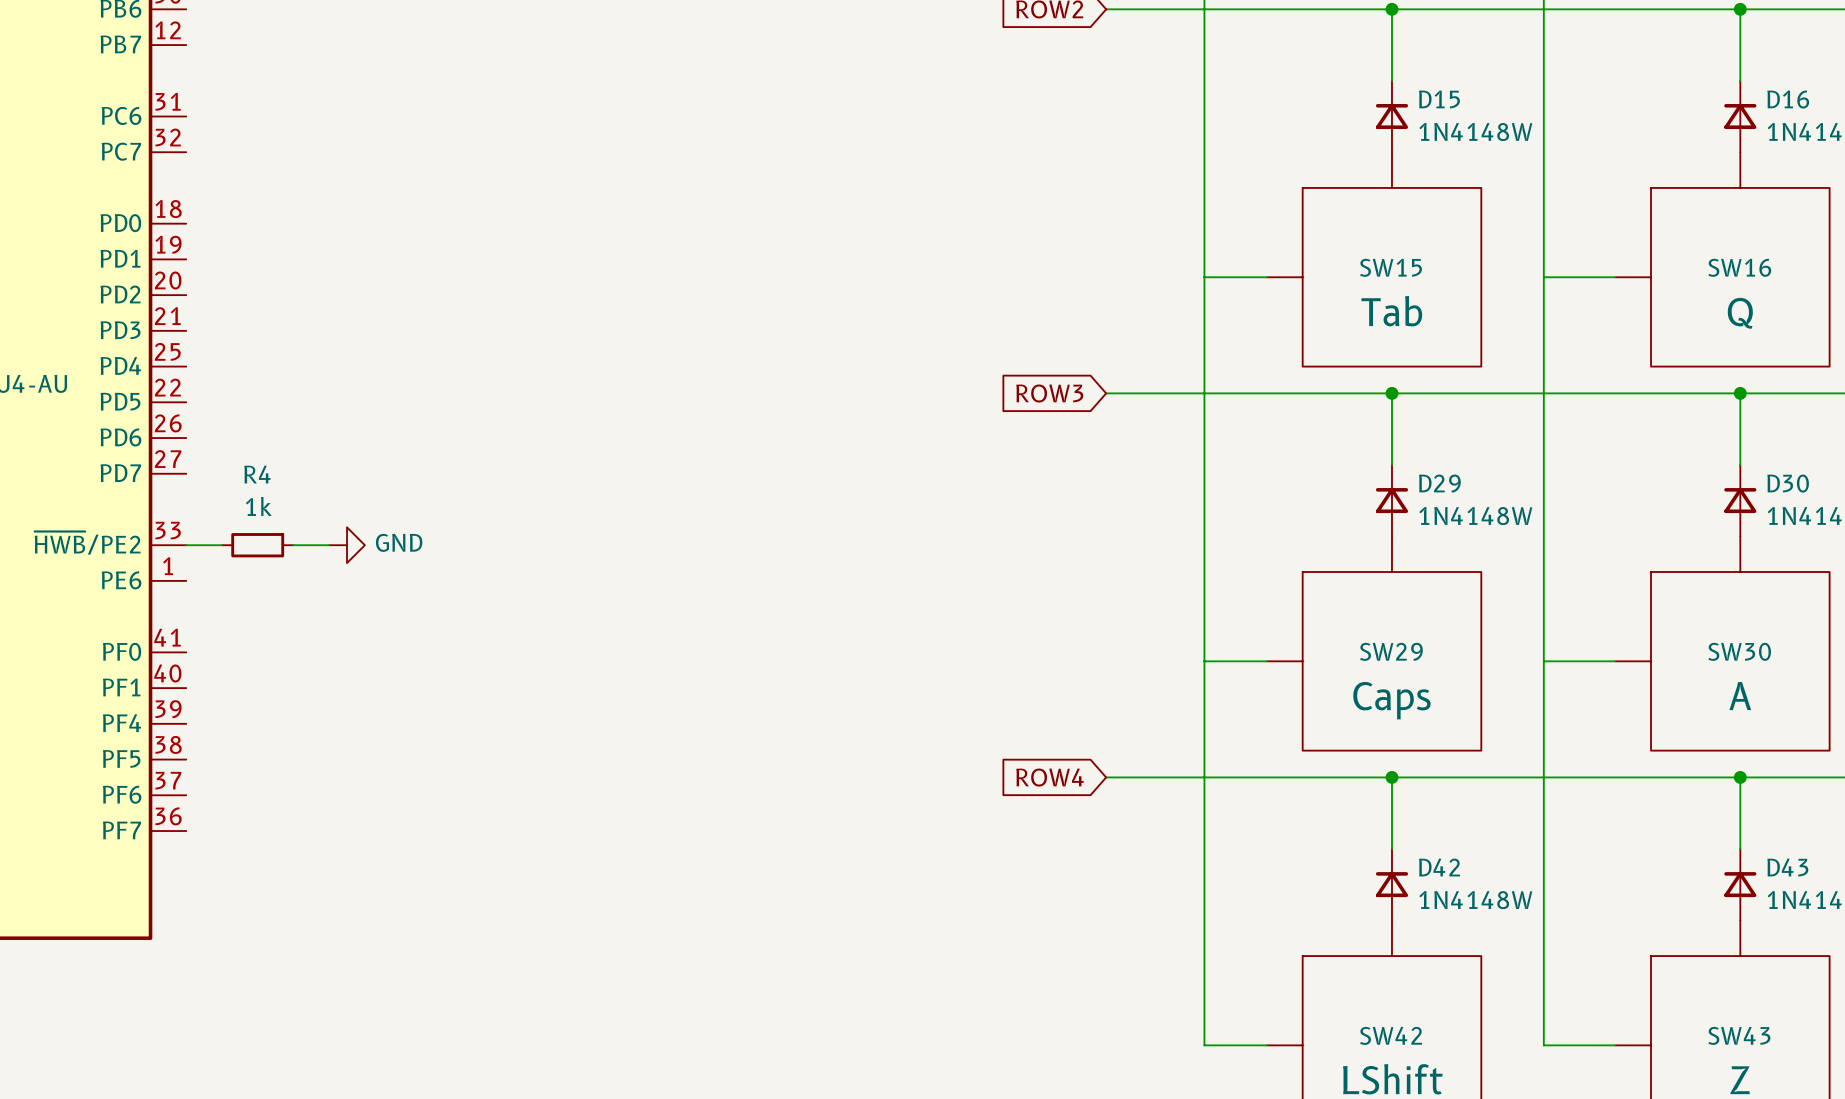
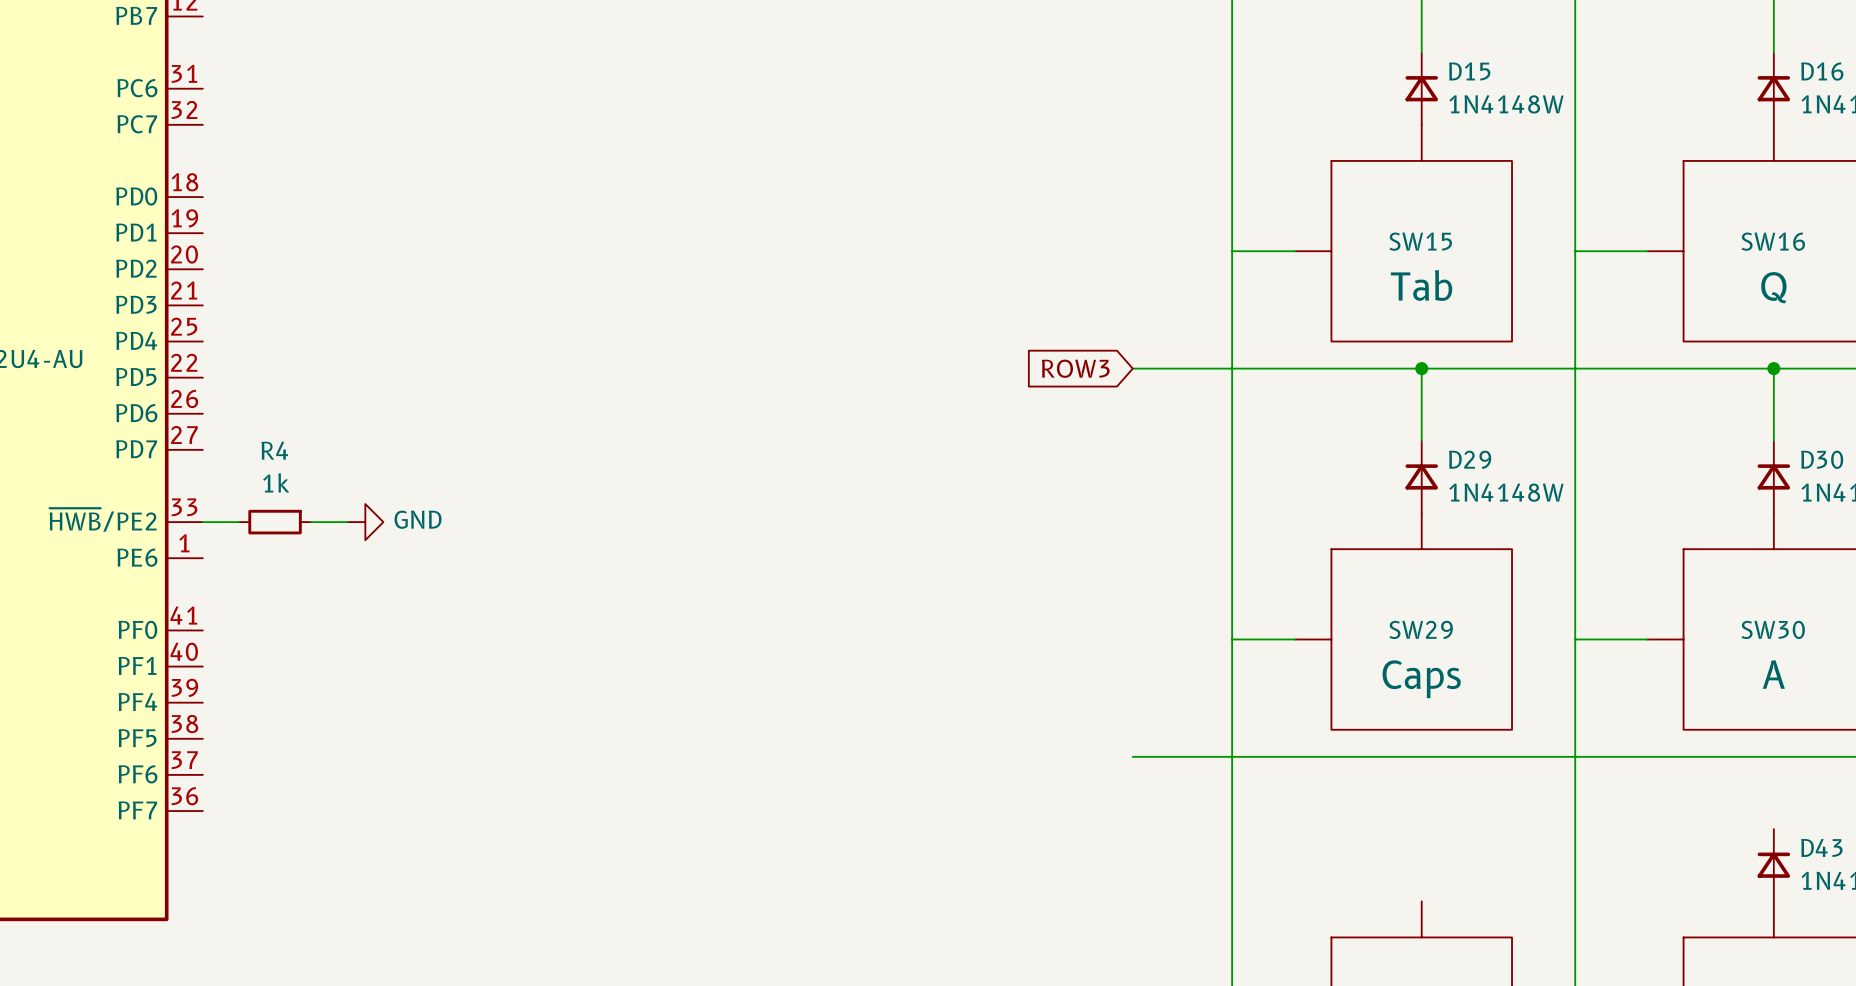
global label: ROW4 (1049, 777) -> none
wire: (1391, 777) (1391, 848) -> none
junction: (1391, 777) -> none
wire: (1740, 777) (1740, 848) -> none
junction: (1740, 777) -> none
D42: 1N4148W (1391, 884) -> none

